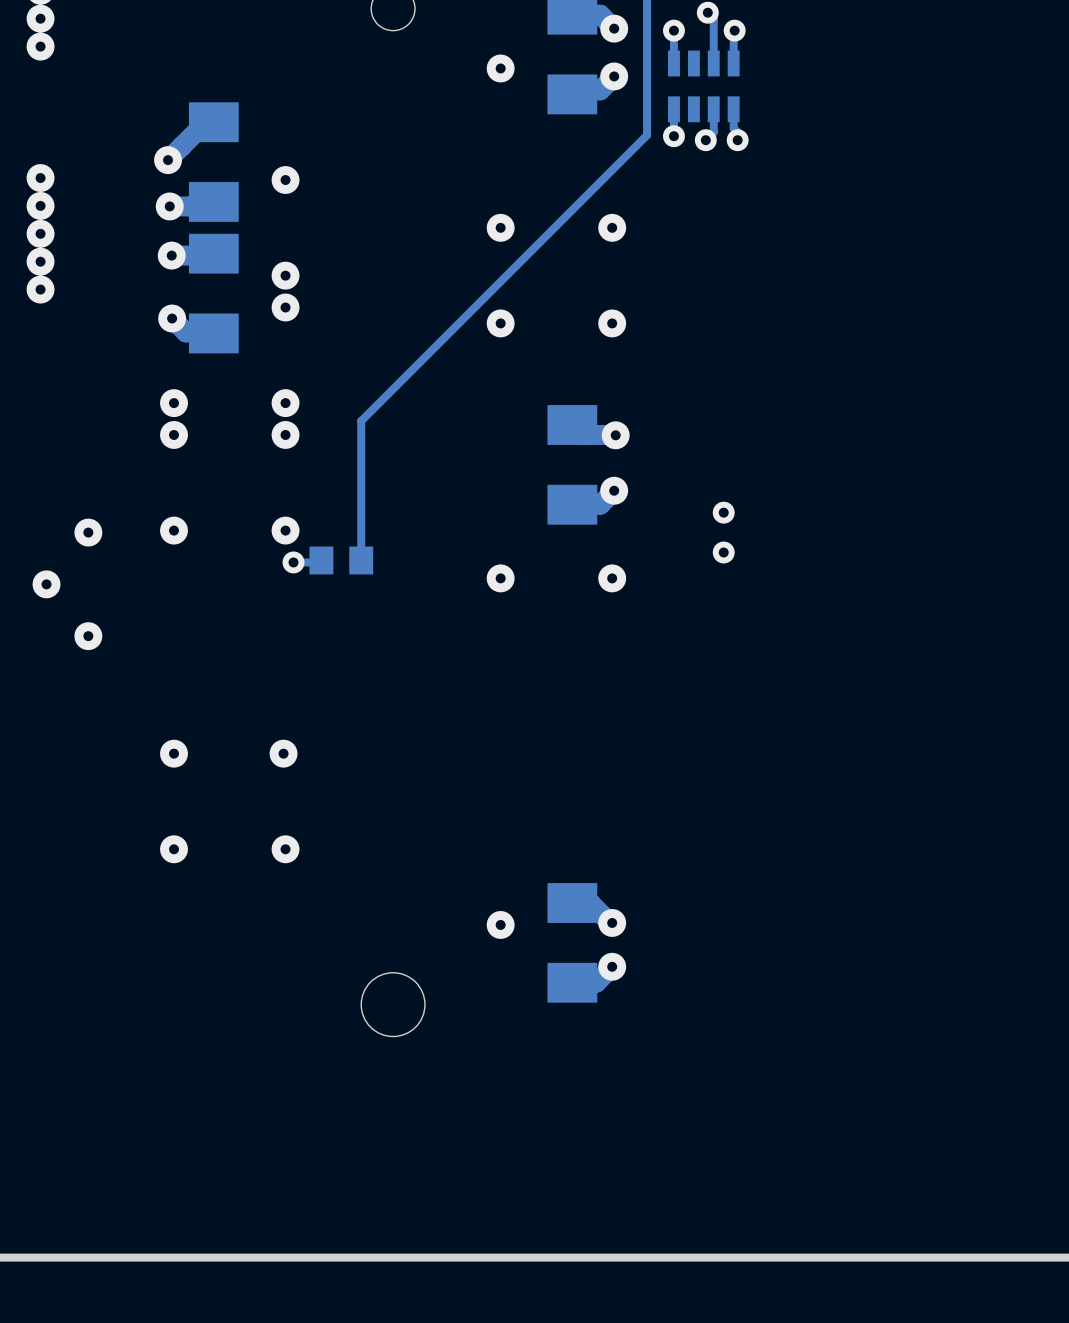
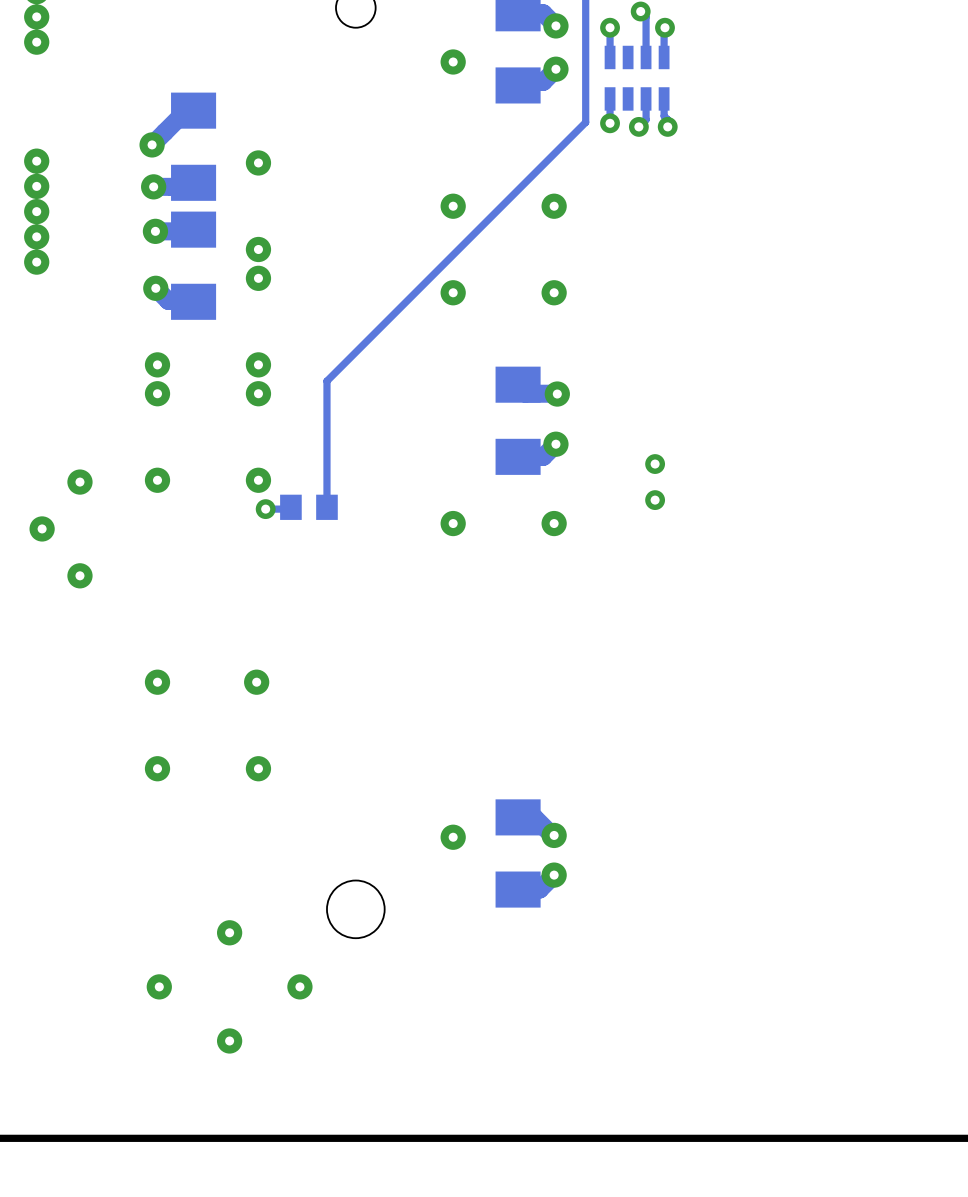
via: none -> (229, 932)
via: none -> (159, 986)
via: none -> (299, 986)
via: none -> (229, 1040)

